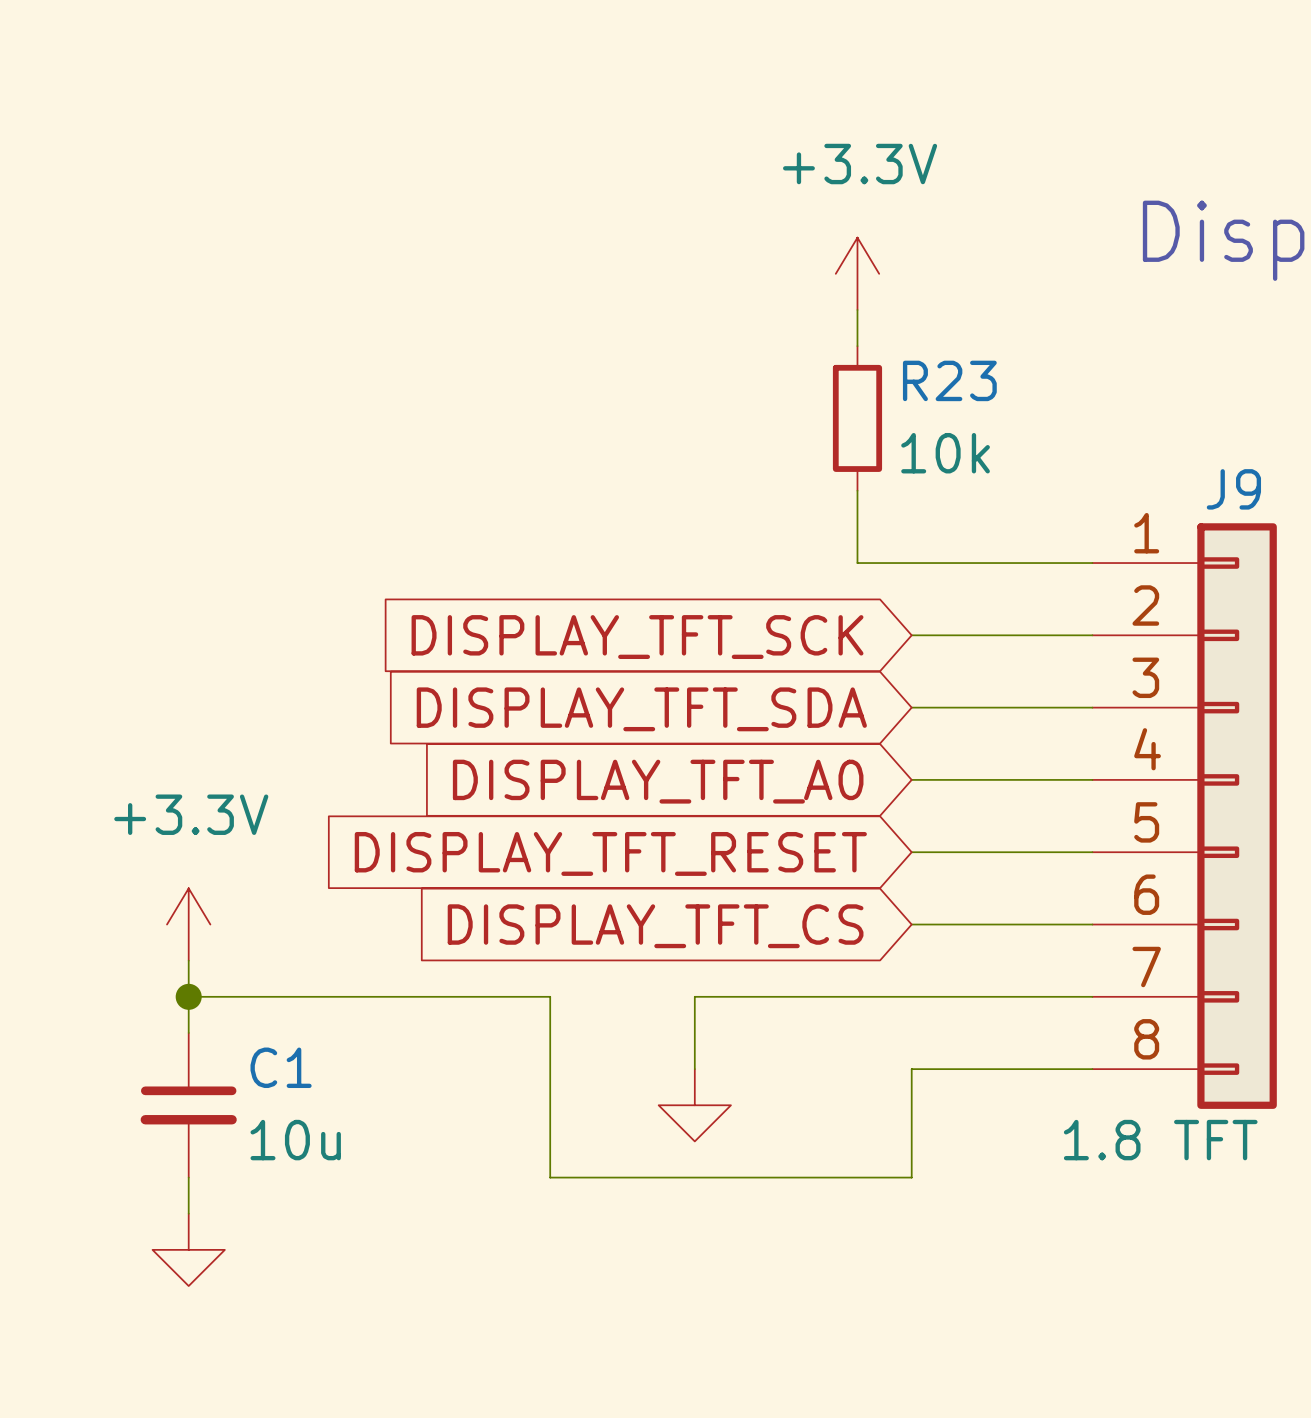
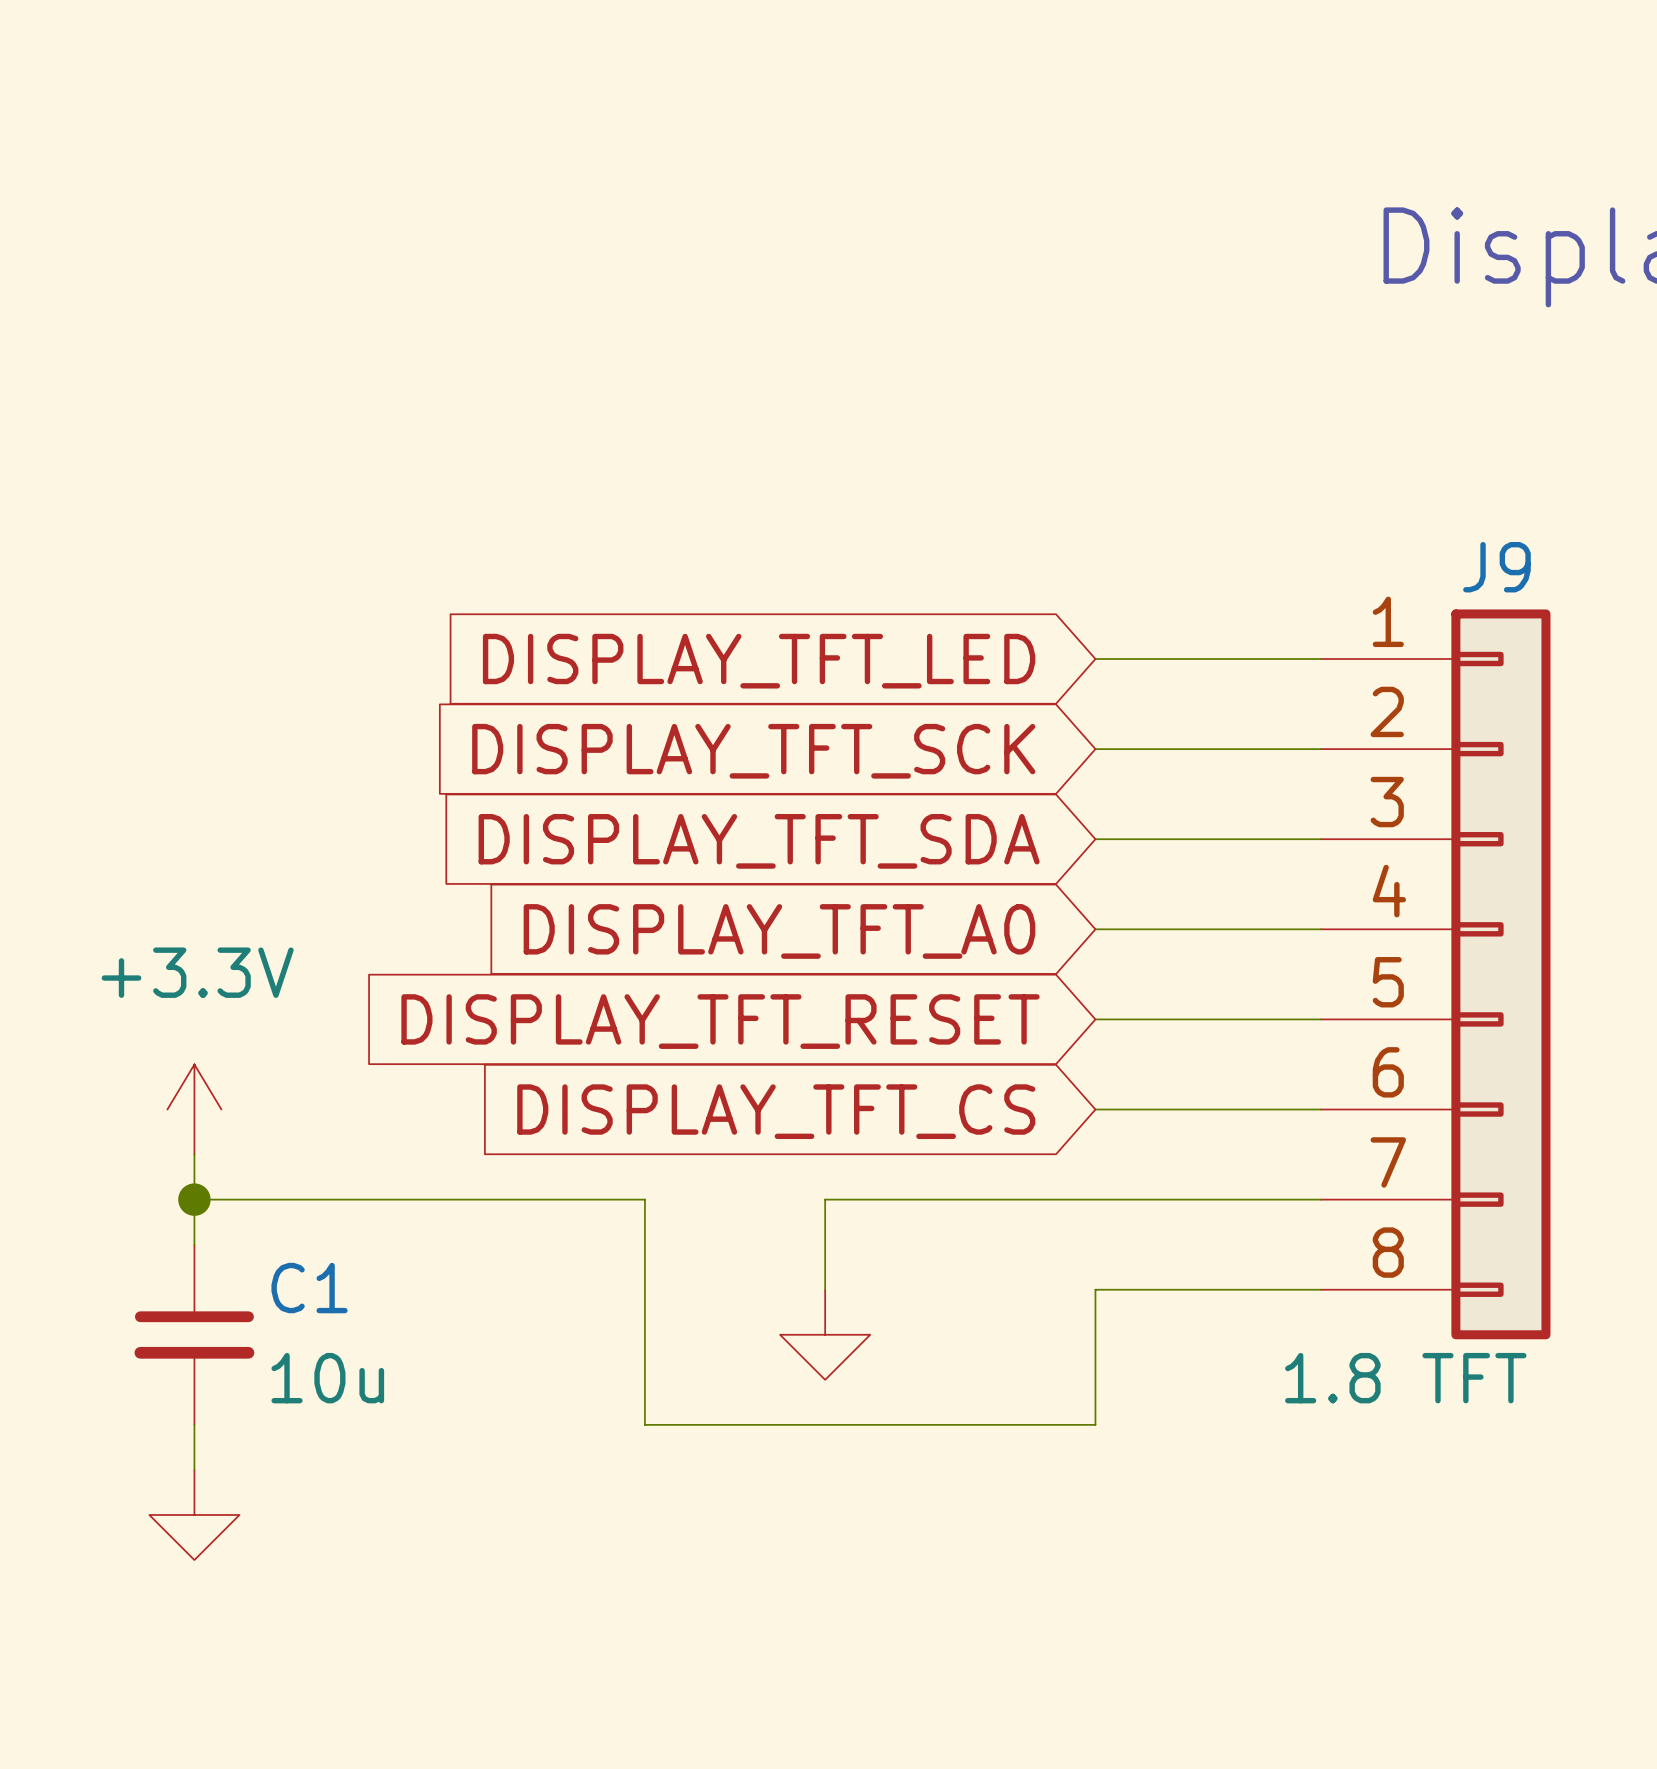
power symbol: +3.3V (857, 273) -> none
wire: (857, 309) (857, 346) -> none
R23: 10k (857, 418) -> none
wire: (857, 490) (857, 563) (911, 563) -> none
global label: none -> DISPLAY_TFT_LED (759, 661)

